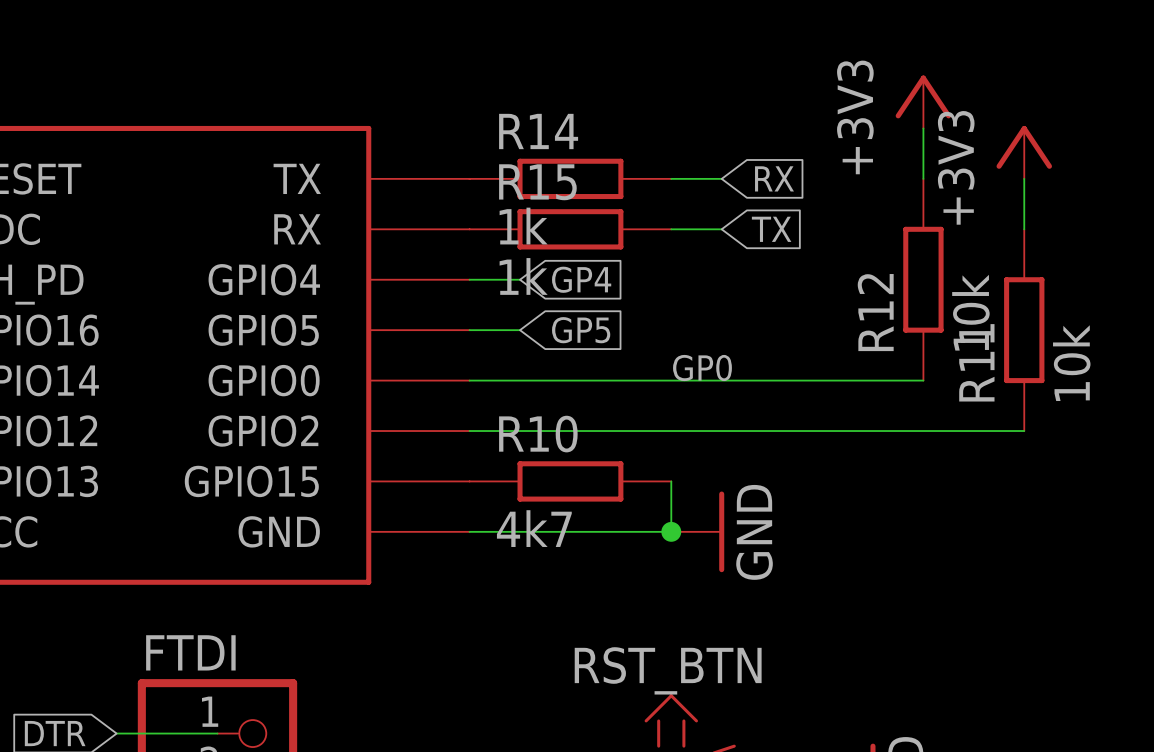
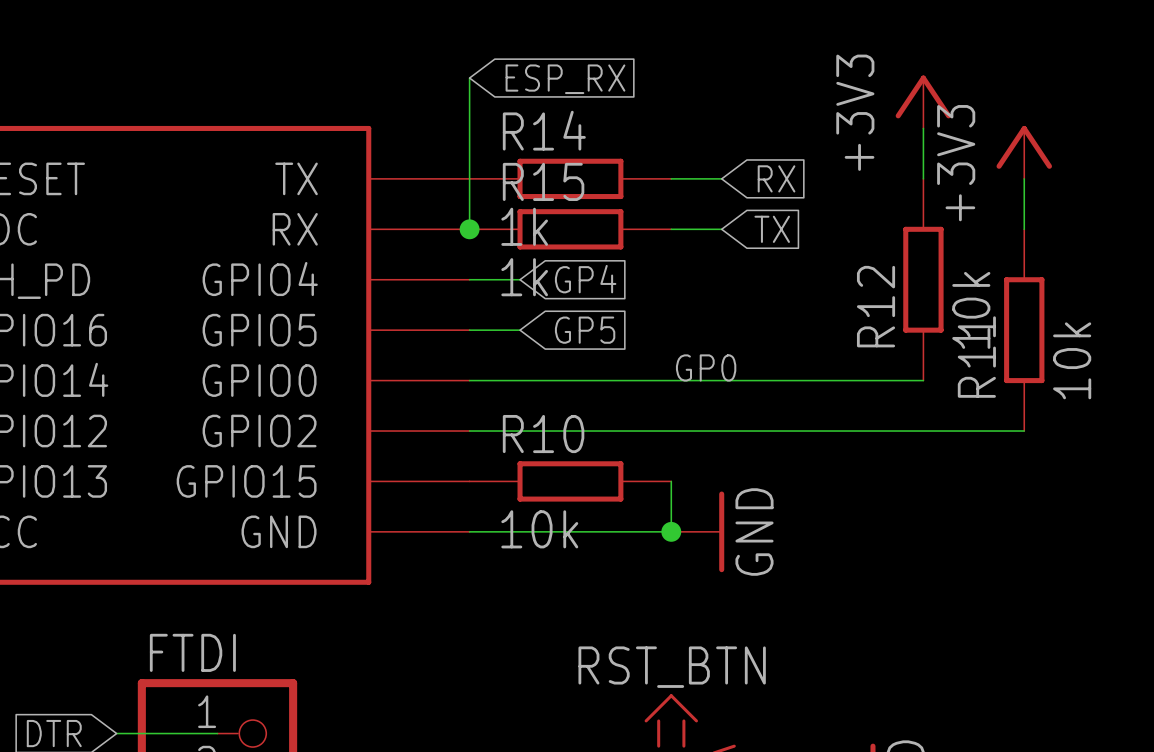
wire: none -> (469, 78) (469, 229)
global label: none -> ESP_RX (565, 79)
junction: none -> (469, 229)
R10 value: 4k7 (534, 528) -> 10k (539, 529)

